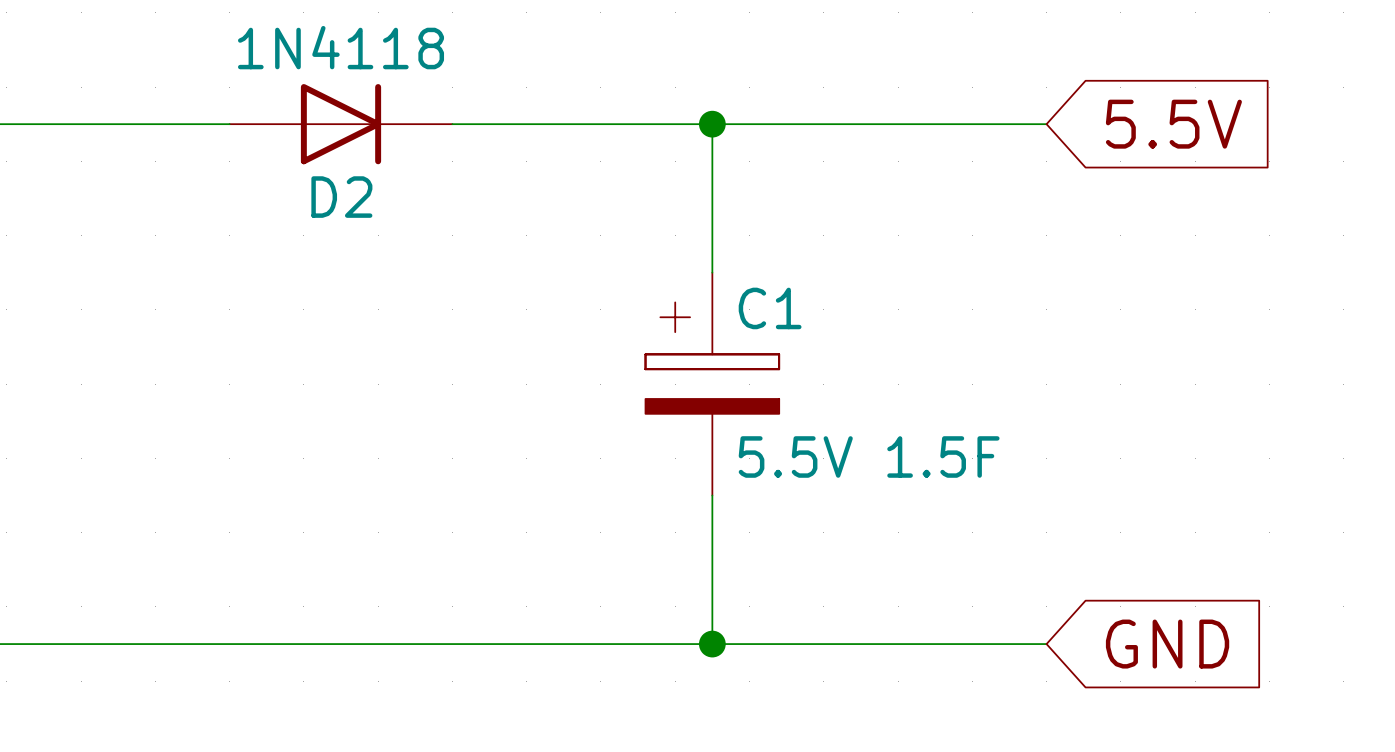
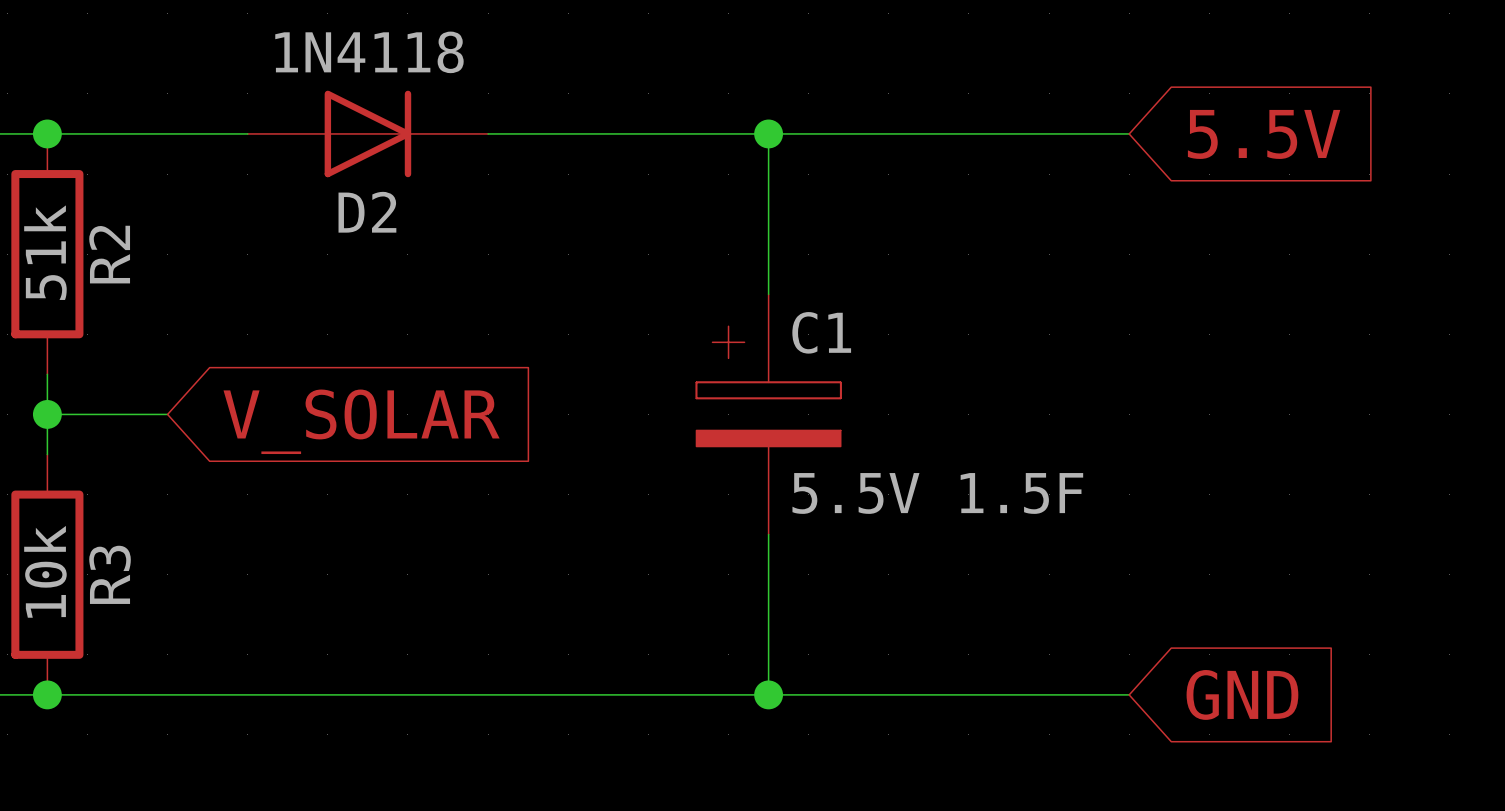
junction: none -> (47, 133)
R2: none -> 51k (47, 254)
wire: none -> (47, 374) (47, 454)
wire: none -> (47, 414) (167, 414)
junction: none -> (47, 414)
global label: none -> V_SOLAR (361, 421)
R3: none -> 10k (47, 574)
junction: none -> (47, 694)

